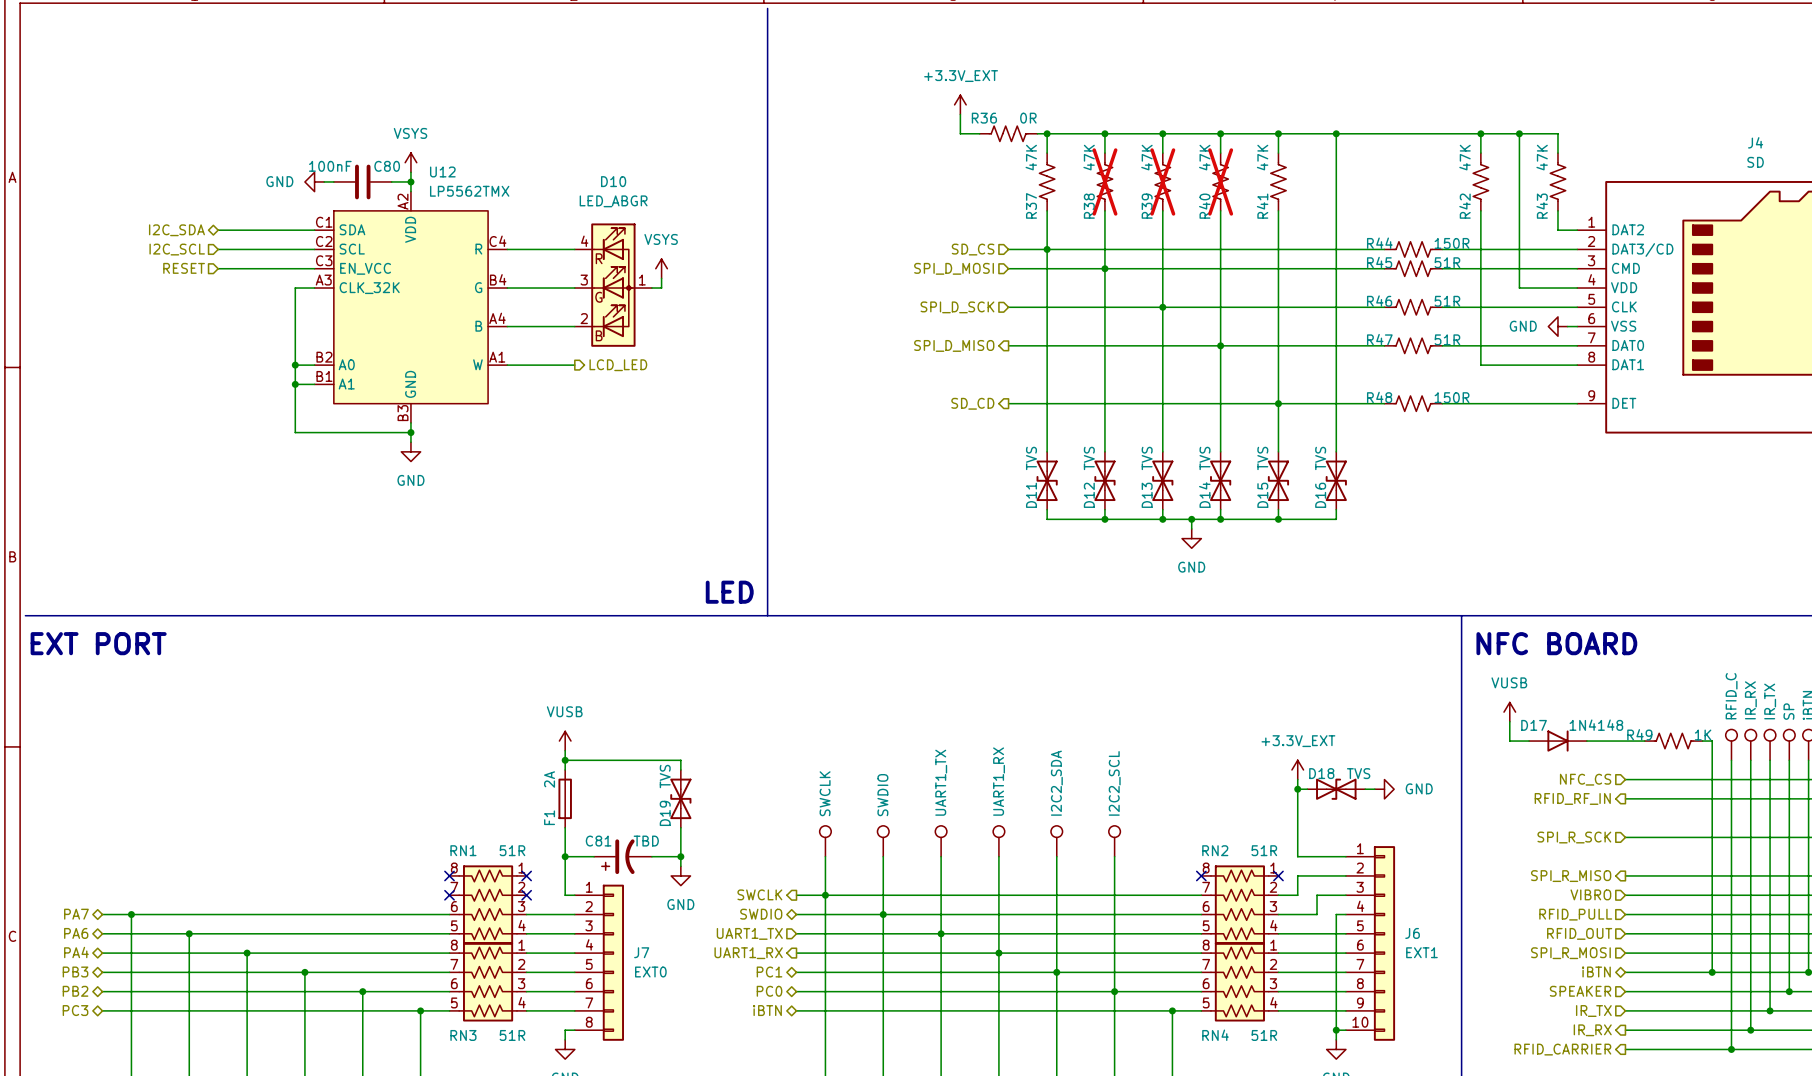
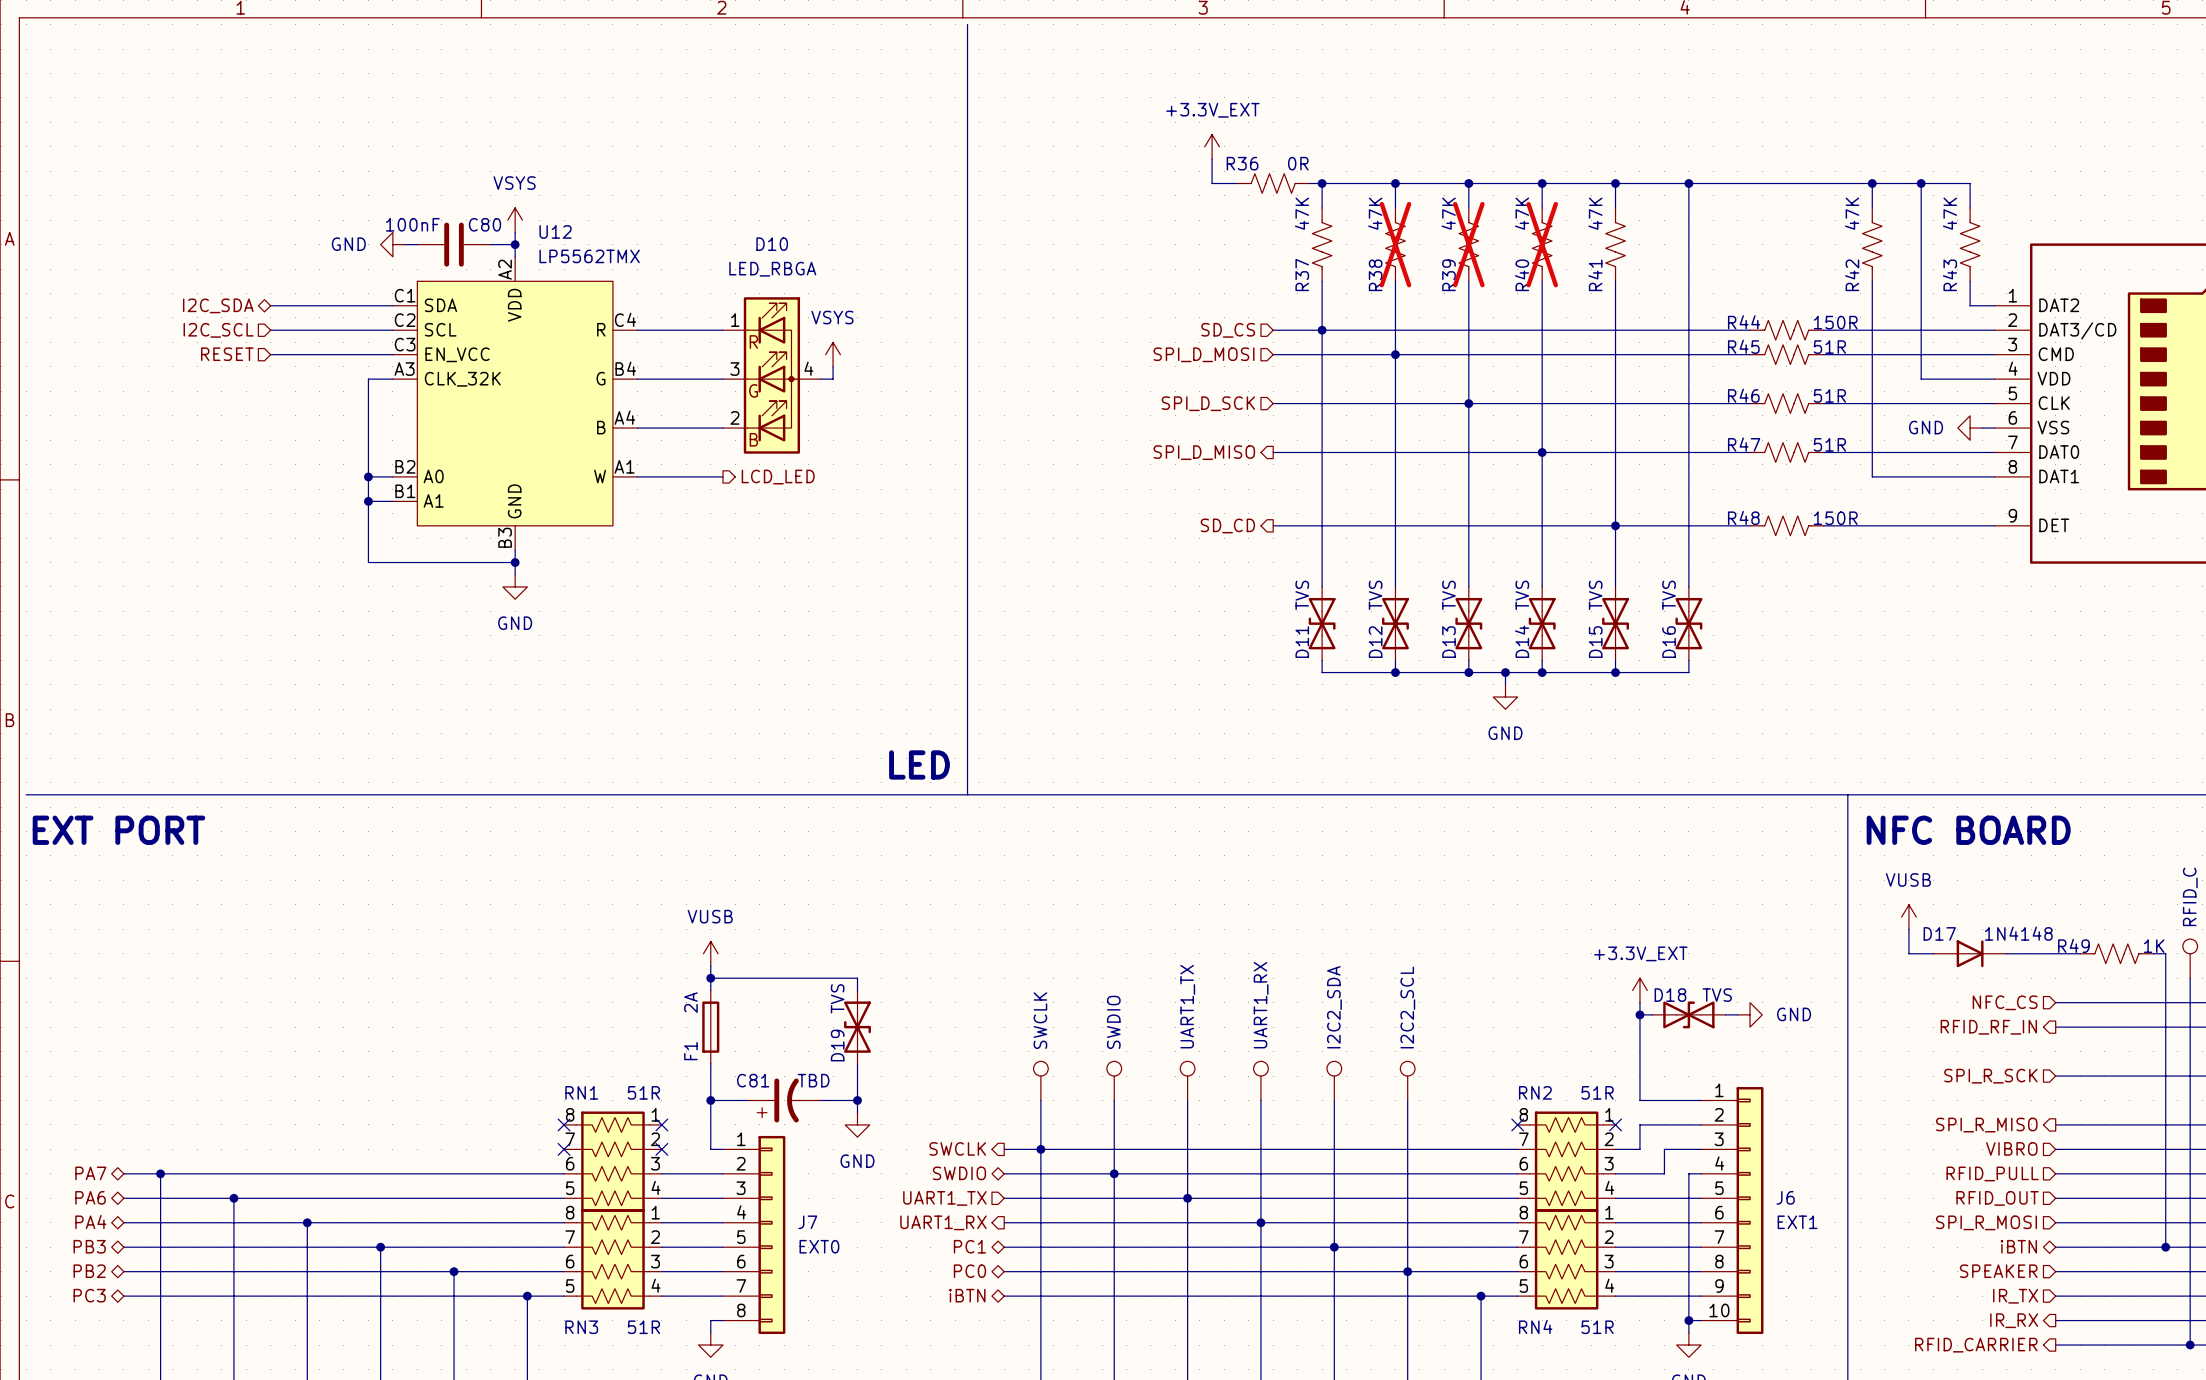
D10 value: LED_ABGR (613, 201) -> LED_RBGA (772, 269)
D10 pin number: 4 (584, 241) -> 1 (735, 320)
D10 pin number: 1 (642, 280) -> 4 (808, 368)

